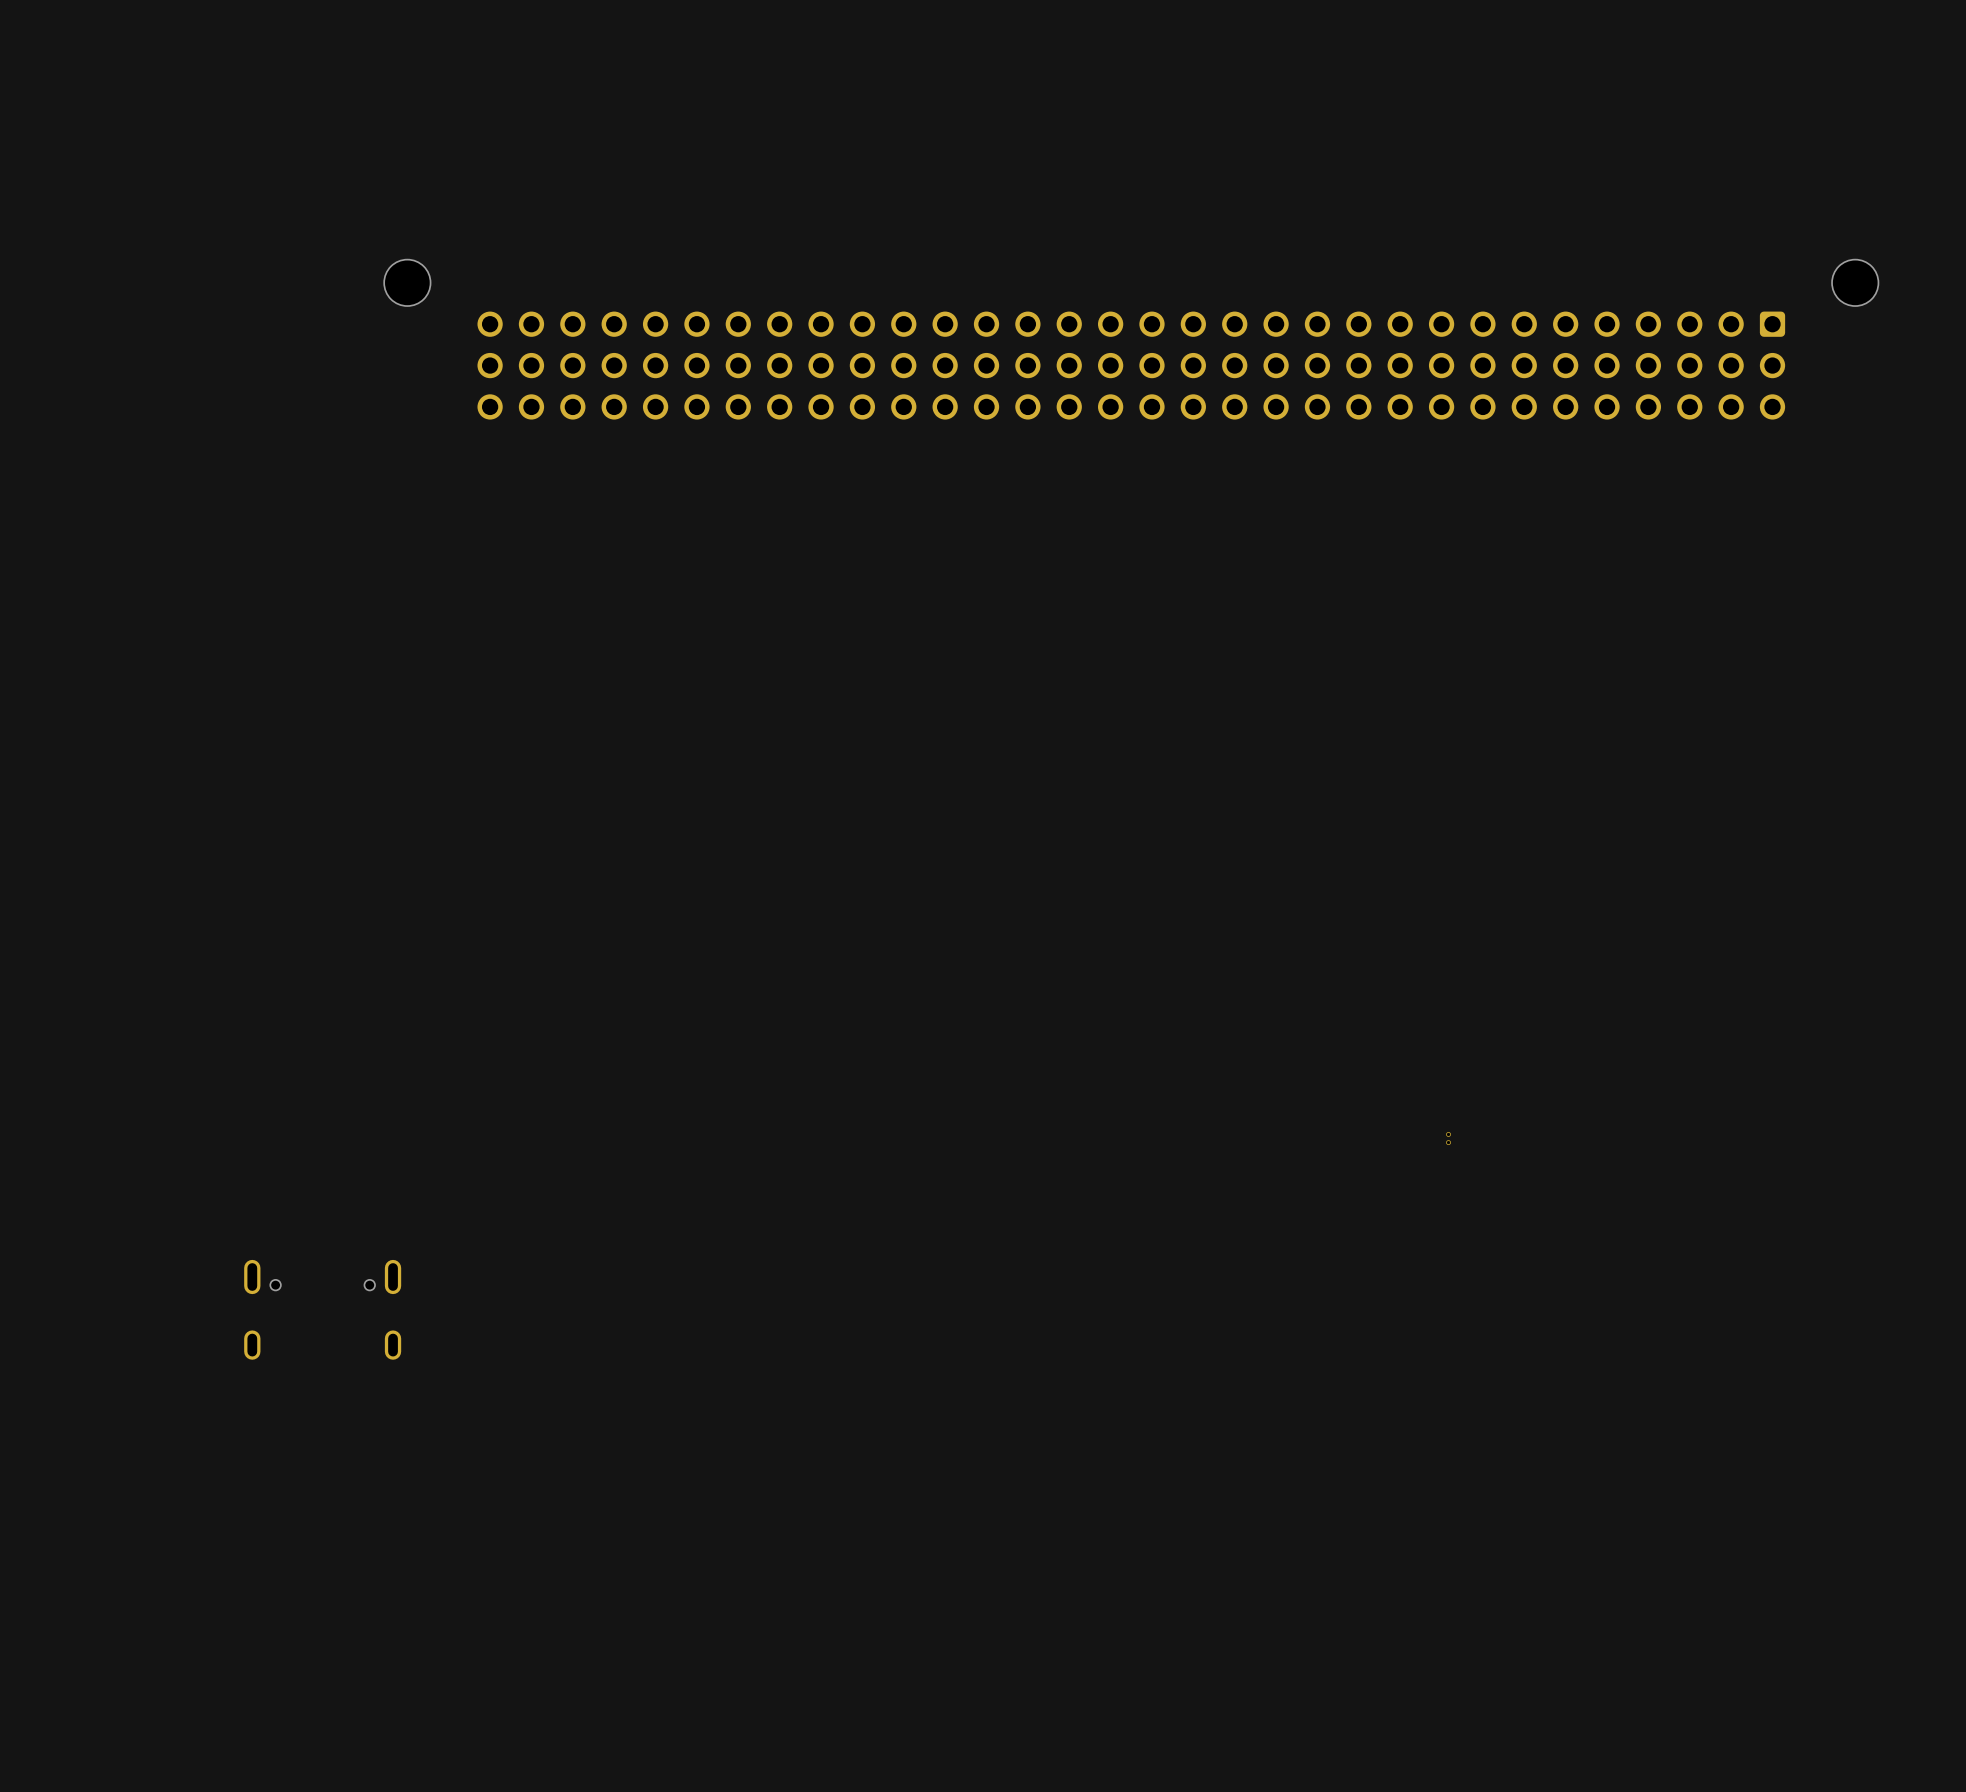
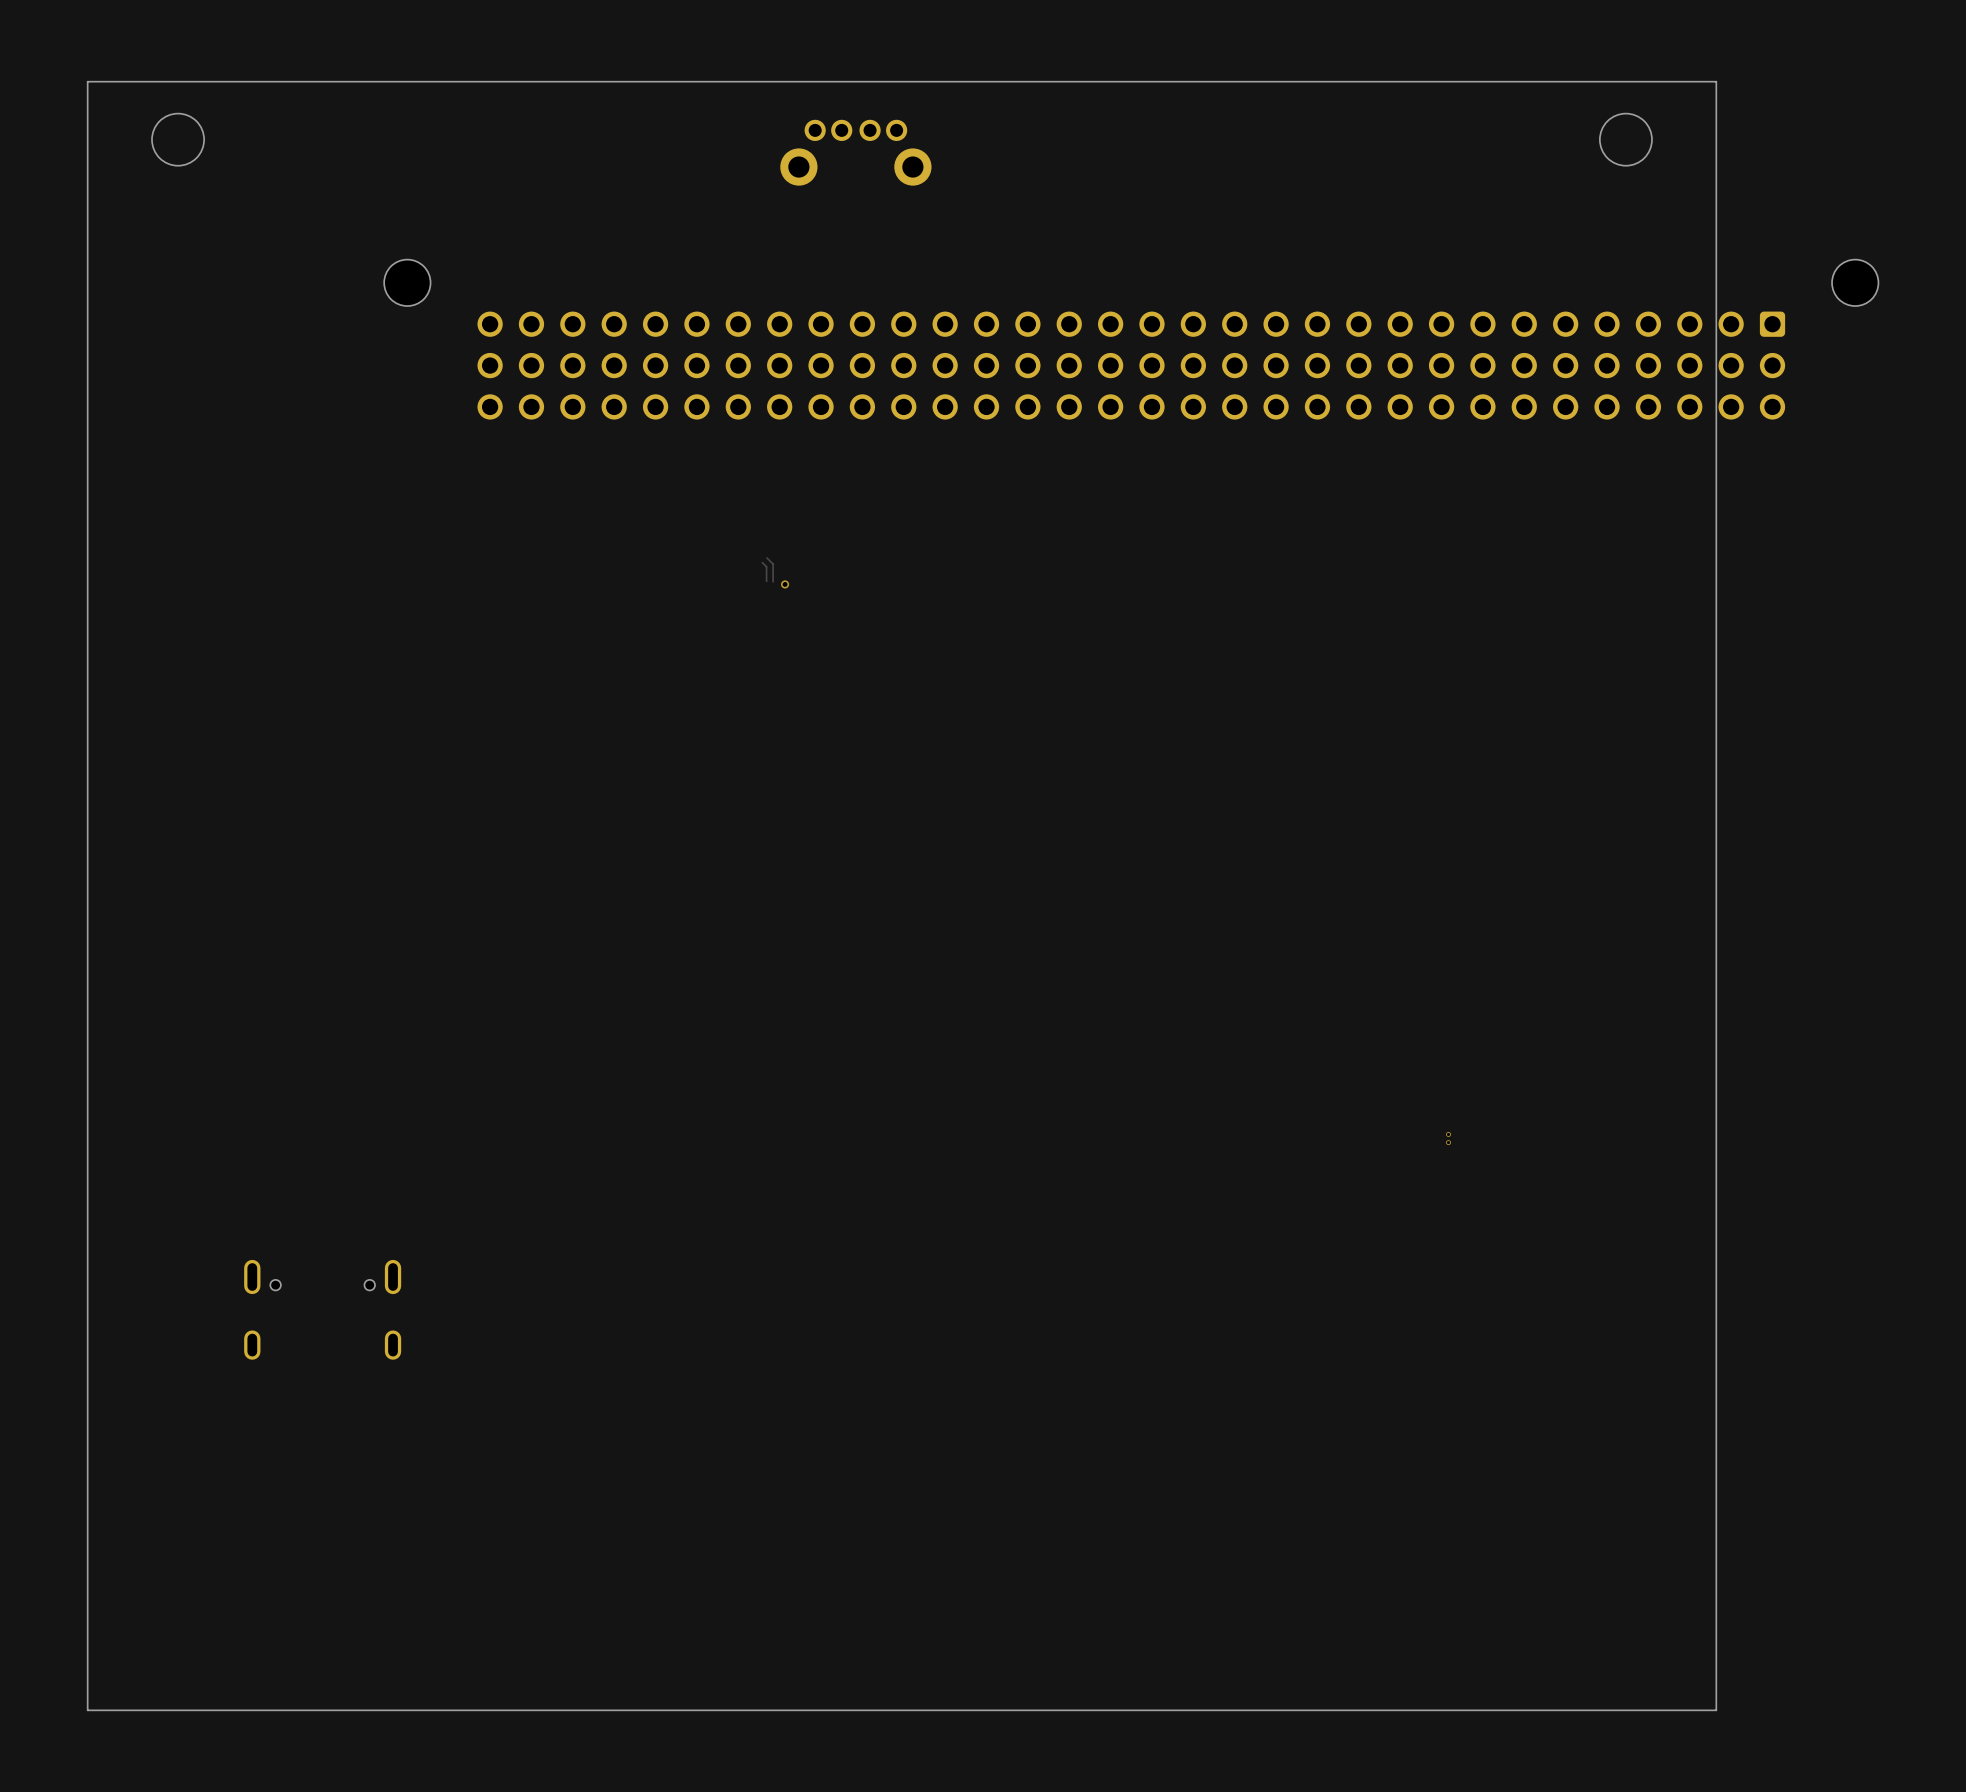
board edge: none -> (1716, 81) (87, 81) (87, 1710) (1716, 1710) (1716, 81)
round board edge: none -> [151, 113, 205, 167]
round board edge: none -> [1599, 113, 1653, 167]
part: none -> (855, 152)
track: none -> (767, 558) (773, 564) (773, 581)
track: none -> (762, 562) (766, 566) (766, 581)
via: none -> (785, 584)

